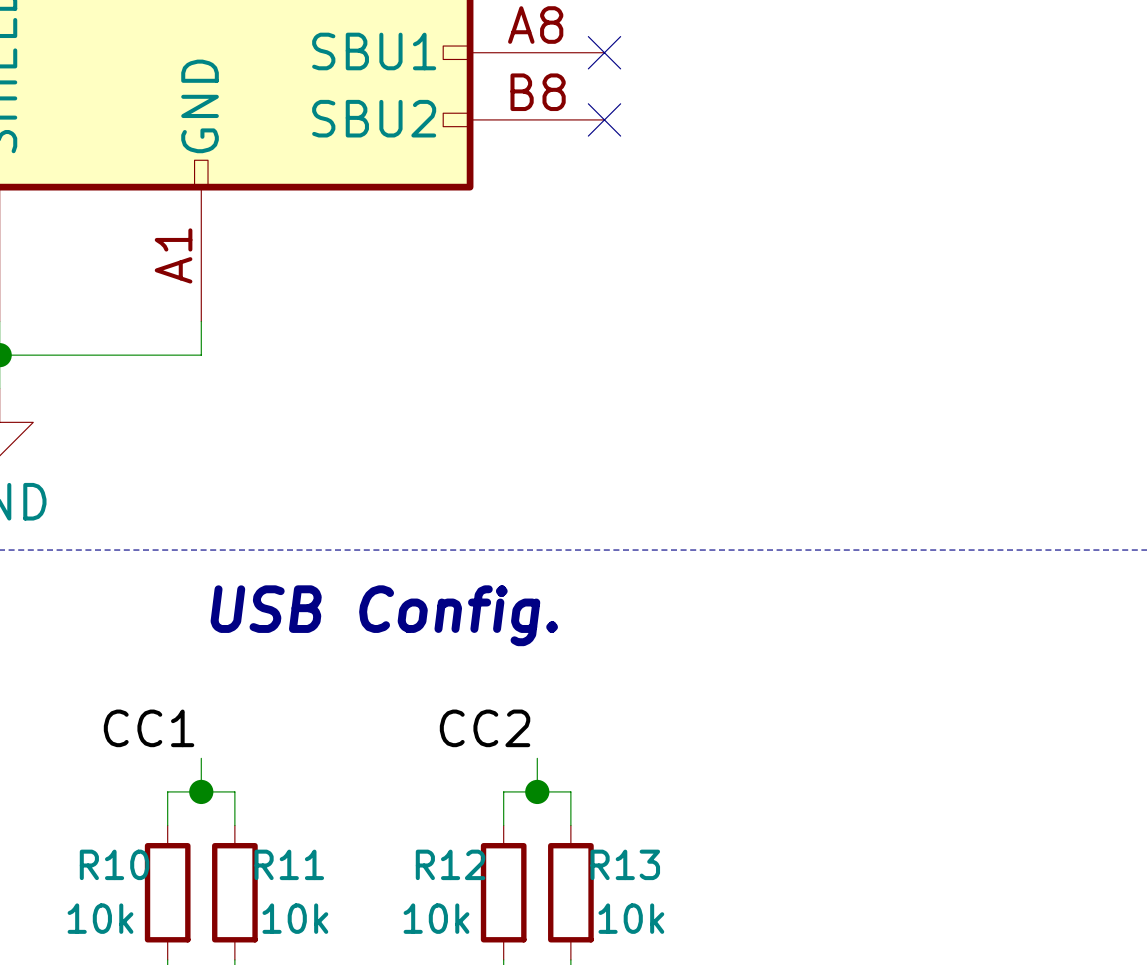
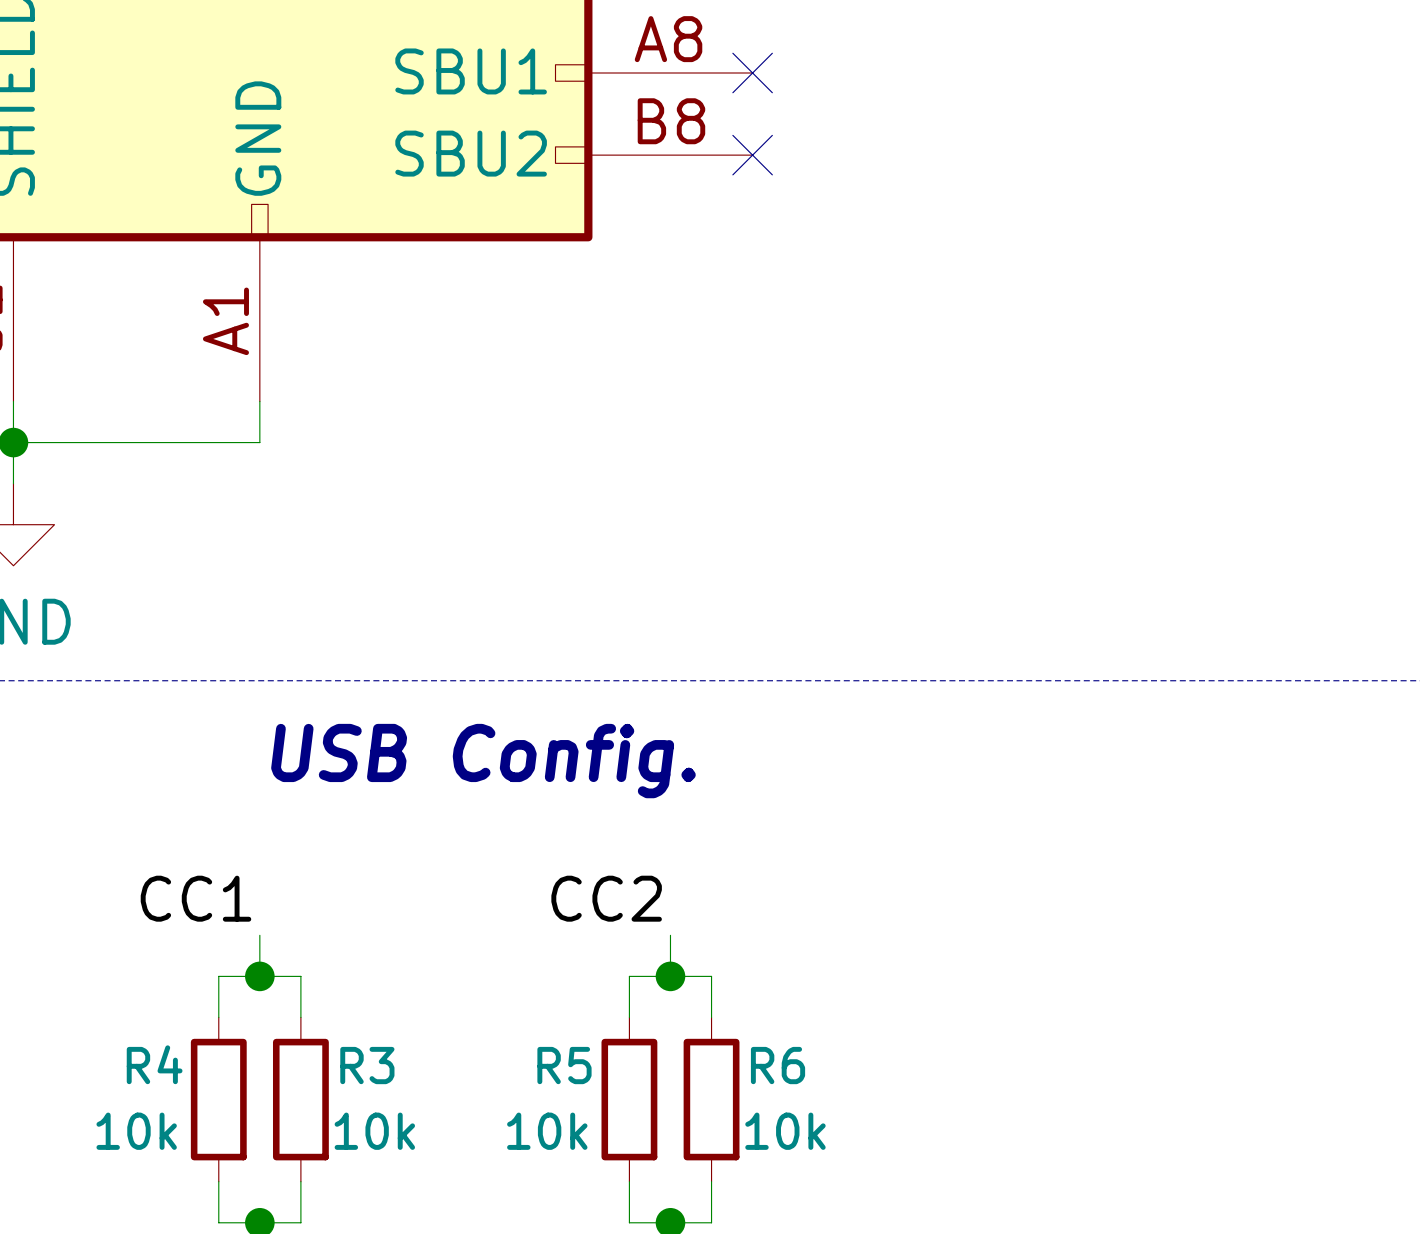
R10 name: R10 (114, 864) -> R4 (154, 1064)
R11 name: R11 (289, 864) -> R3 (367, 1065)
R12 name: R12 (450, 864) -> R5 (564, 1065)
R13 name: R13 (625, 864) -> R6 (778, 1065)

